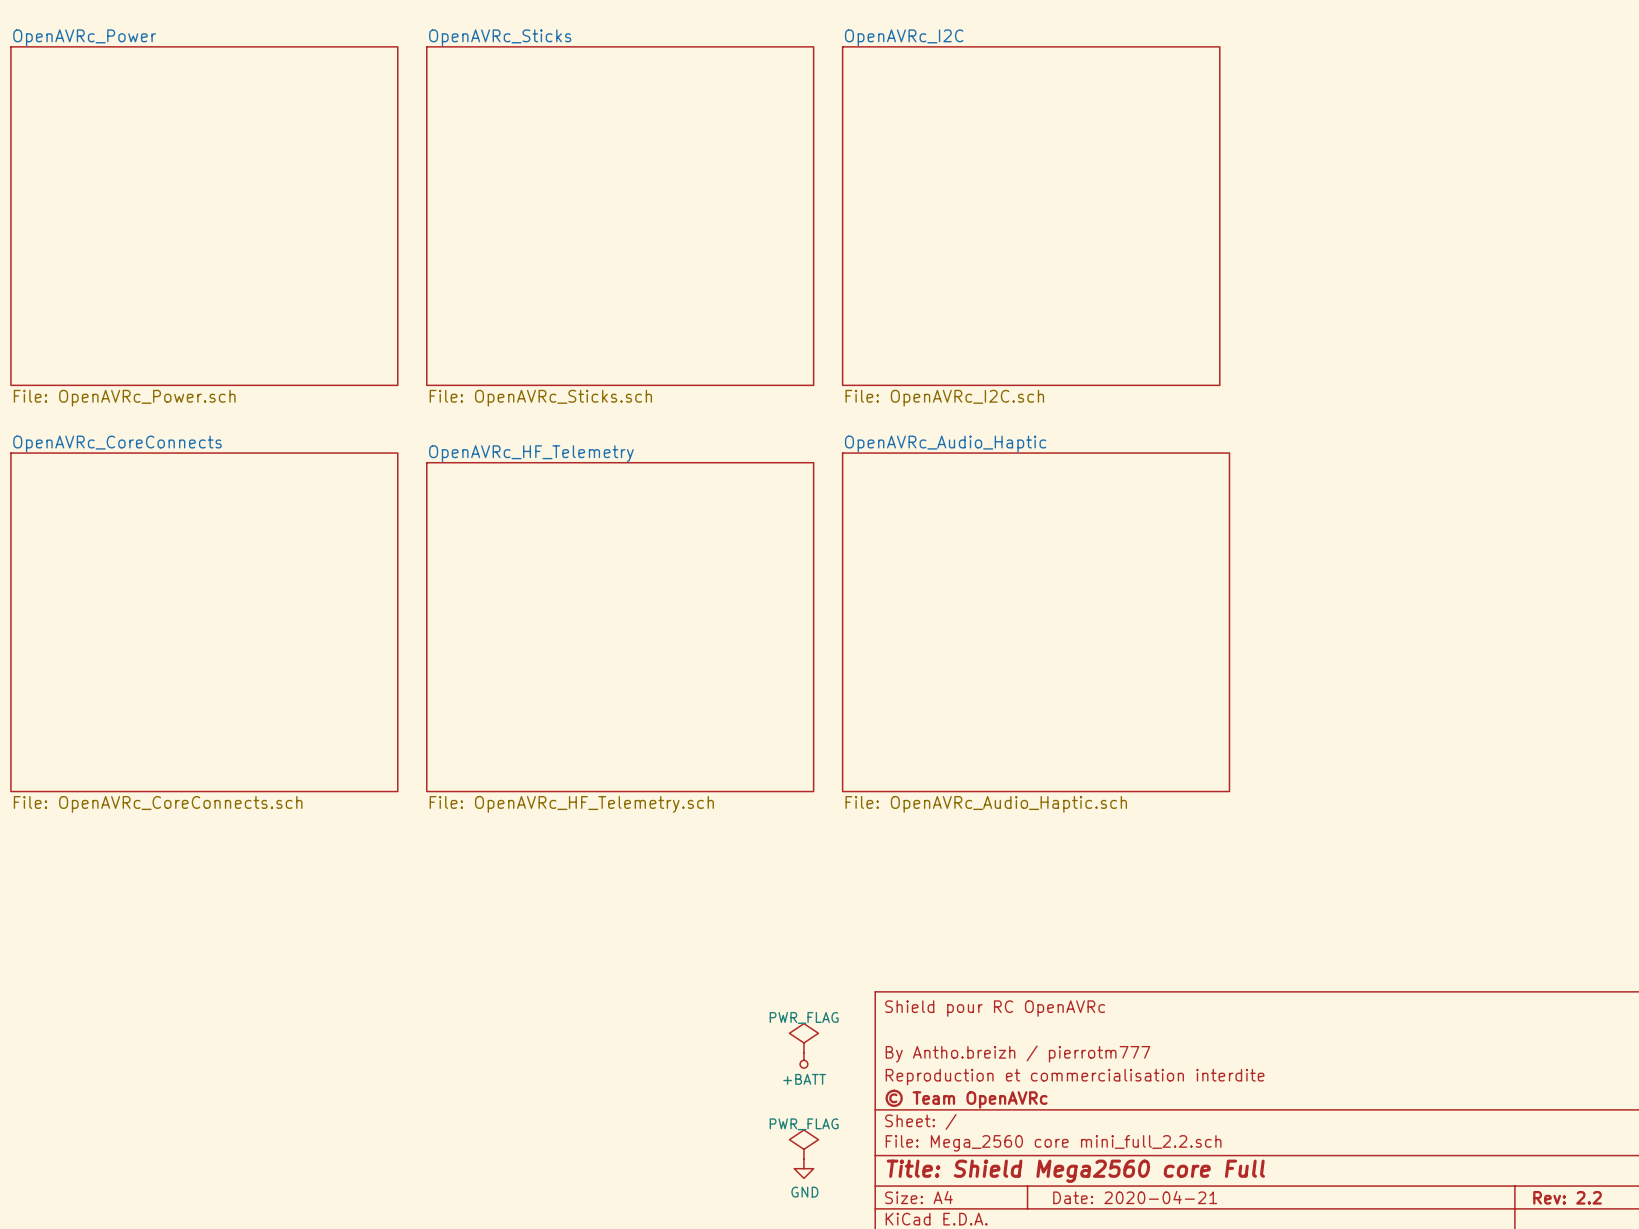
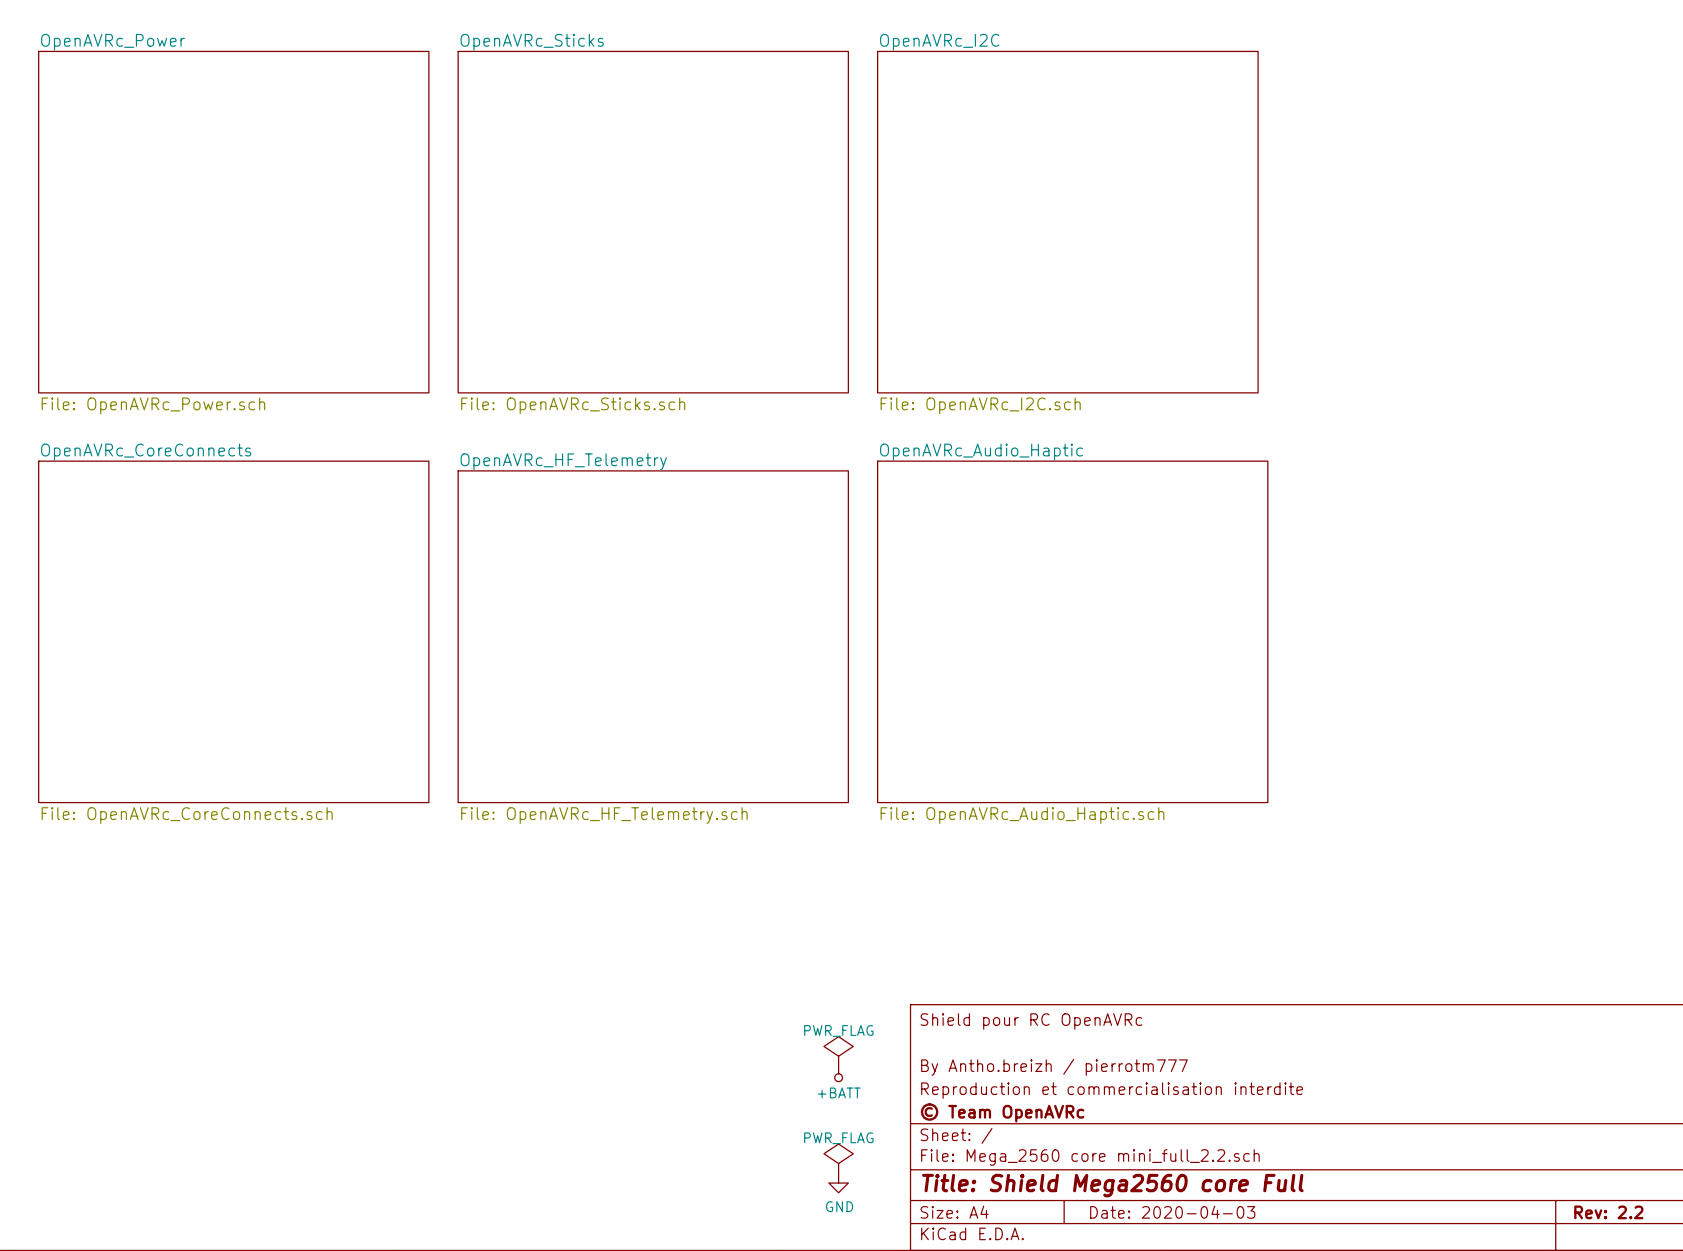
title block: Date: 2020-04-21 (1135, 1197) -> Date: 2020-04-03 (1172, 1212)

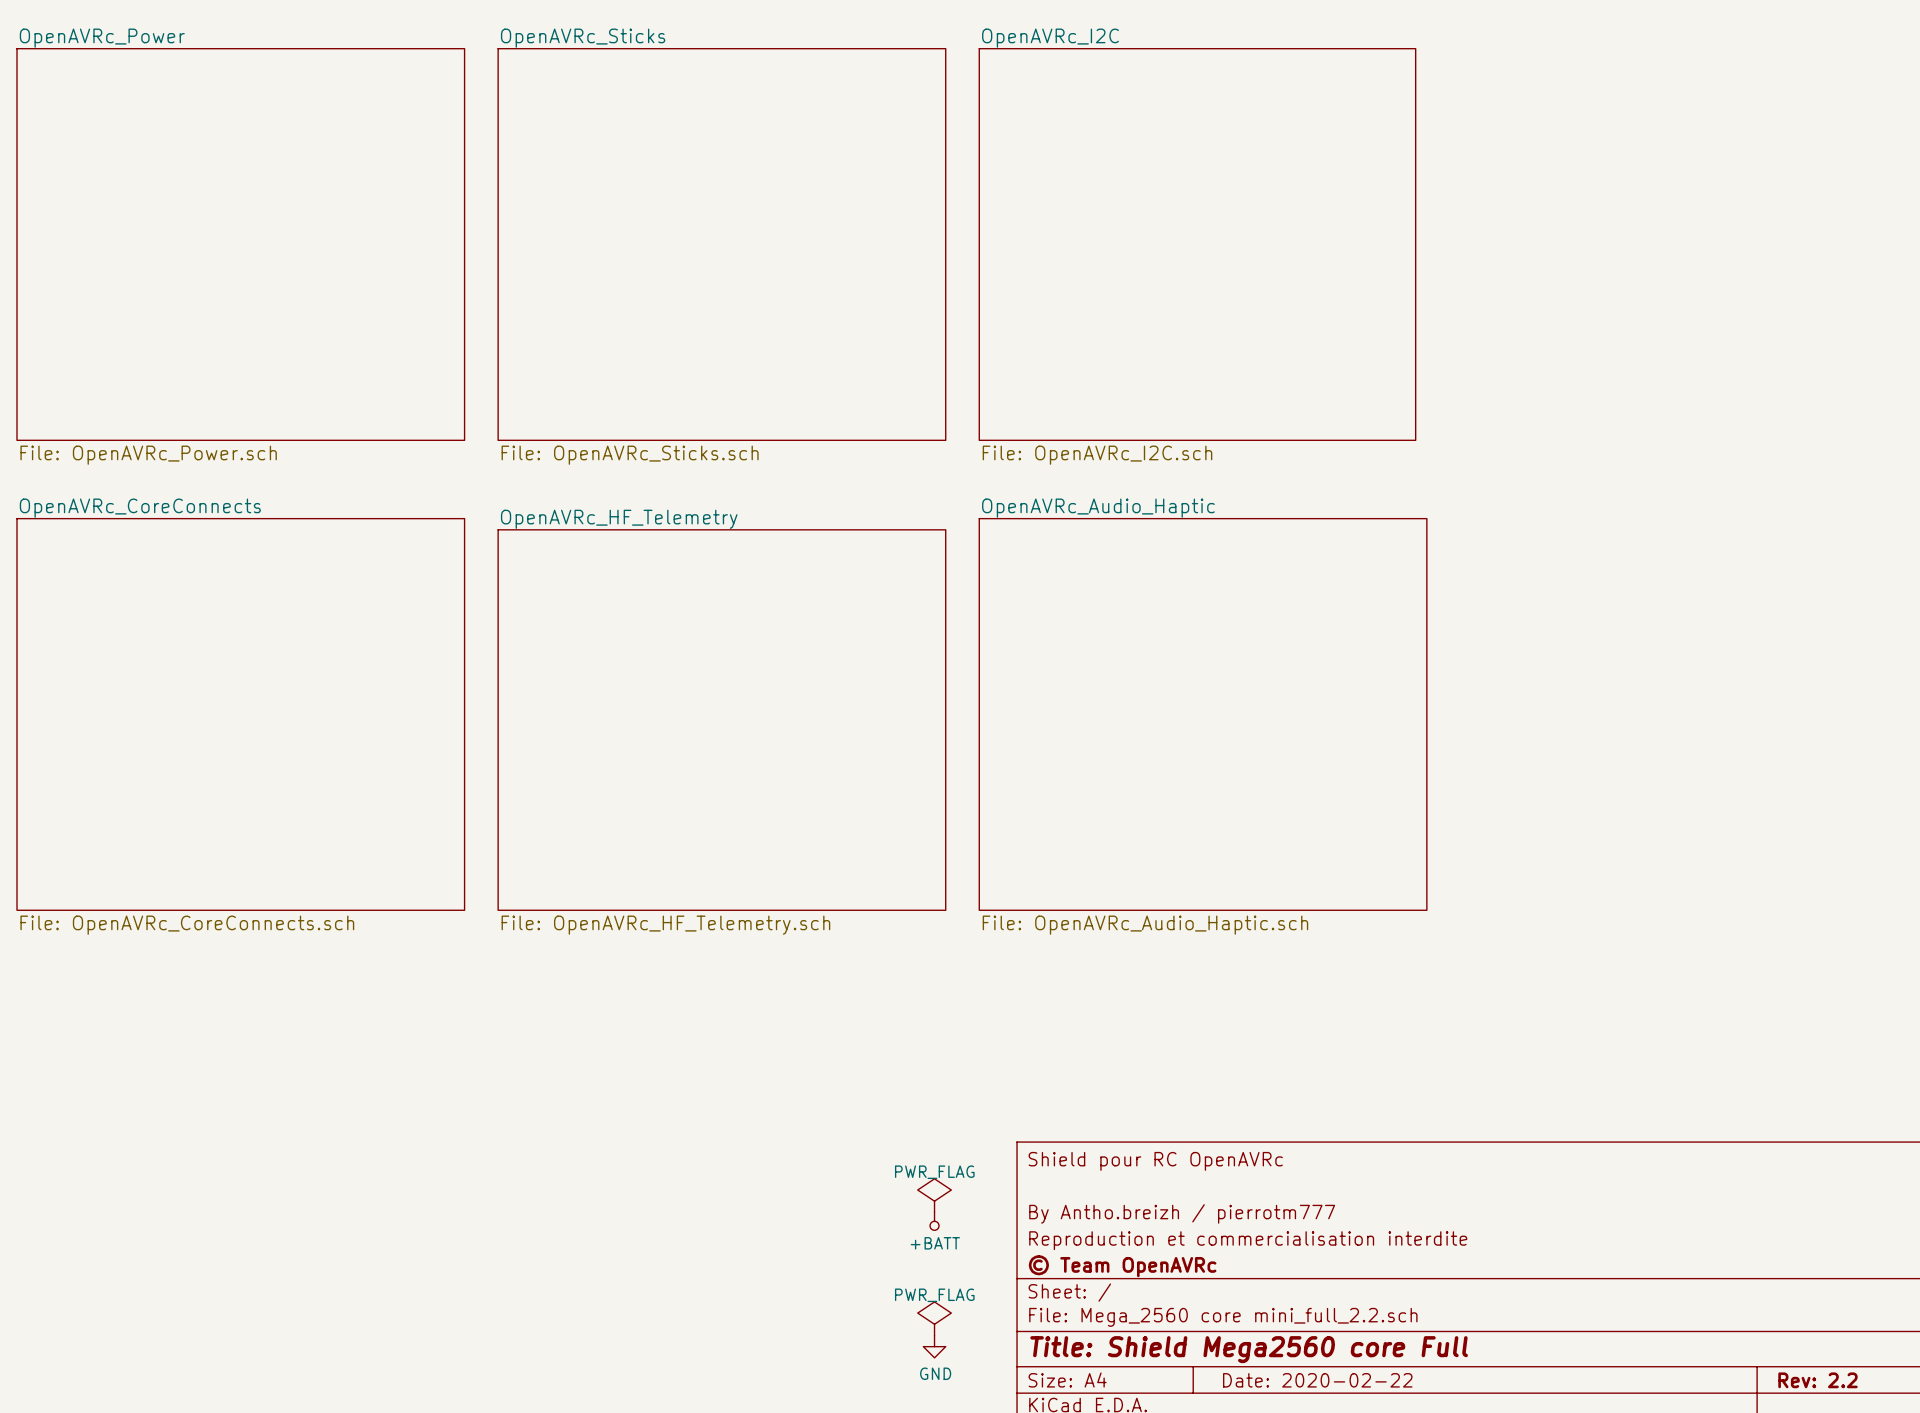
title block: Date: 2020-04-03 (1172, 1212) -> Date: 2020-02-22 (1317, 1380)

